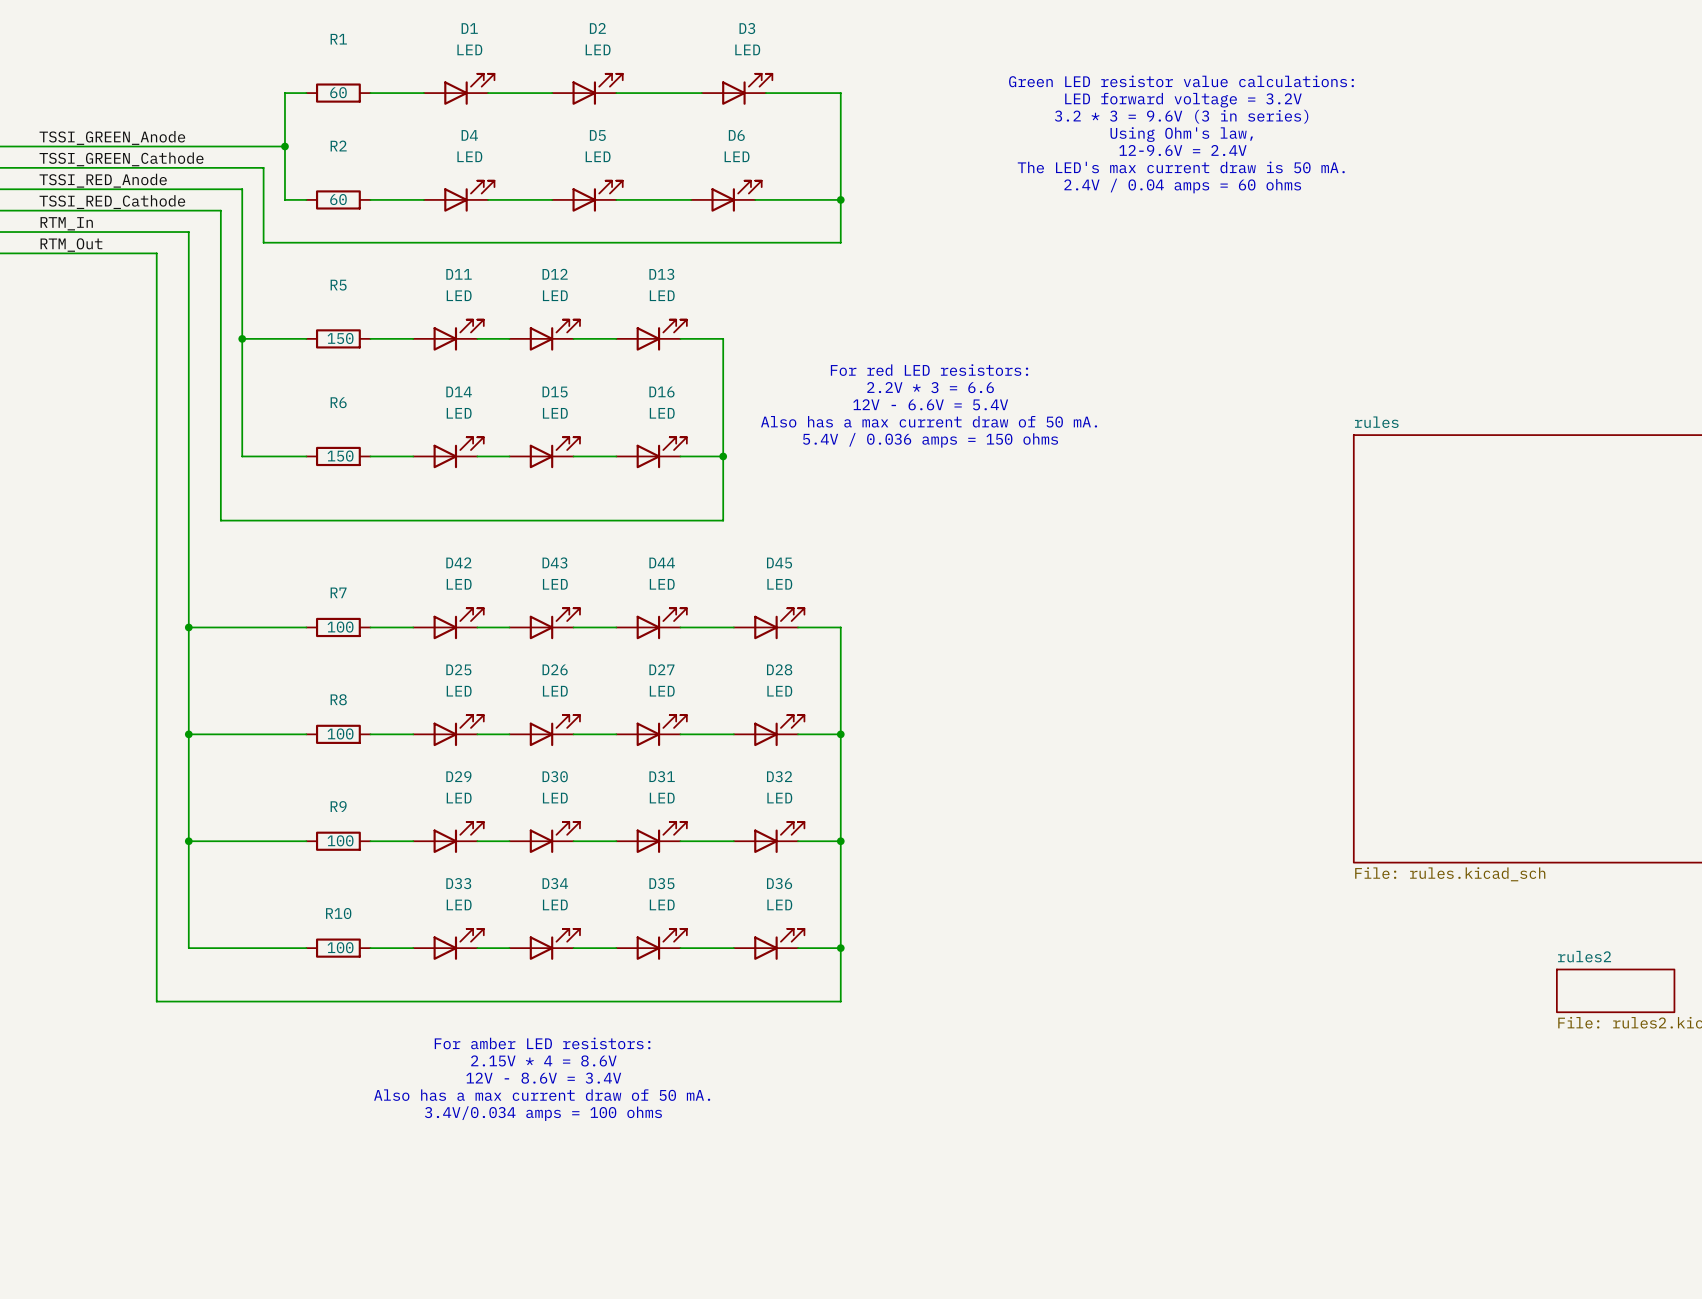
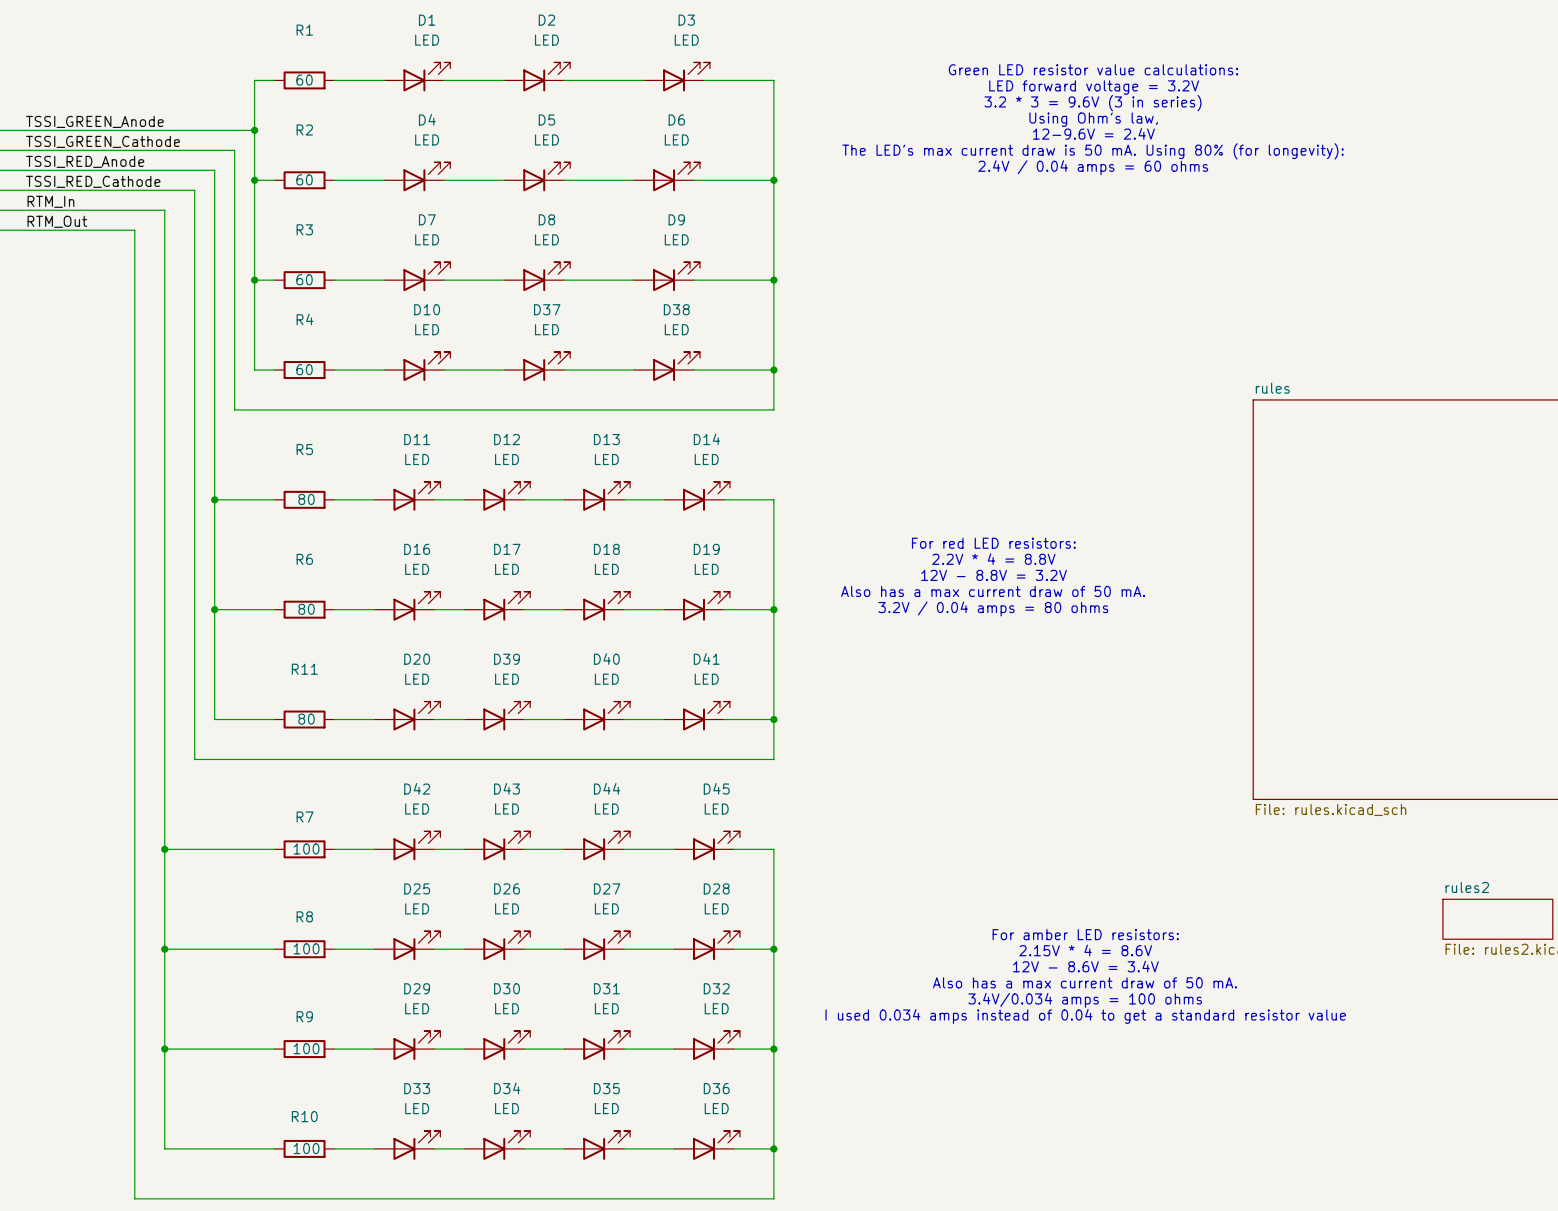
text: The LED's max current draw is 50 mA. (1181, 167) -> The LED's max current draw is 50 mA. Using 80% (for longevity): (1092, 151)
wire: none -> (254, 180) (254, 370) (274, 370)
junction: none -> (254, 180)
wire: (263, 242) (840, 242) -> (234, 220) (234, 409) (773, 409) (773, 220)
D7: none -> LED (417, 276)
D8: none -> LED (537, 276)
D9: none -> LED (667, 276)
wire: none -> (254, 280) (274, 280)
junction: none -> (254, 280)
R3: none -> 60 (304, 280)
wire: none -> (334, 280) (384, 280)
wire: none -> (444, 280) (504, 280)
wire: none -> (564, 280) (634, 280)
wire: none -> (694, 280) (773, 280)
junction: none -> (773, 280)
D11 position: (448, 335) -> (407, 496)
D12 position: (544, 335) -> (497, 496)
D13 position: (651, 335) -> (597, 496)
wire: (242, 338) (306, 338) -> (214, 499) (274, 499)
junction: (242, 338) -> none
R5 position: (338, 338) -> (304, 499)
R5 value: 150 (340, 338) -> 80 (306, 499)
wire: (370, 338) (413, 338) -> (334, 499) (374, 499)
wire: (477, 338) (509, 338) -> (434, 499) (464, 499)
wire: (573, 338) (616, 338) -> (524, 499) (564, 499)
wire: (680, 338) (723, 338) (723, 520) (220, 520) -> (773, 759) (194, 759) (194, 479)
text: For red LED resistors: (929, 370) -> none
text: 2.2V * 3 = 6.6 (930, 387) -> none
D10: none -> LED (417, 366)
D37: none -> LED (537, 366)
D38: none -> LED (667, 366)
R4: none -> 60 (304, 370)
wire: none -> (334, 370) (384, 370)
wire: none -> (444, 370) (504, 370)
wire: none -> (564, 370) (634, 370)
wire: none -> (694, 370) (773, 370)
junction: none -> (773, 370)
text: 12V - 6.6V = 5.4V (930, 404) -> none
text: Also has a max current draw of 50 mA. (929, 421) -> none
text: 5.4V / 0.036 amps = 150 ohms (930, 440) -> none
D14 position: (448, 452) -> (697, 496)
D15: LED (544, 452) -> none
D16 position: (651, 452) -> (407, 606)
wire: (242, 456) (306, 456) -> (214, 419) (214, 719) (274, 719)
R6 position: (338, 456) -> (304, 609)
R6 value: 150 (340, 456) -> 80 (306, 609)
wire: (370, 456) (413, 456) -> (334, 609) (374, 609)
wire: (477, 456) (509, 456) -> (434, 609) (464, 609)
wire: (573, 456) (616, 456) -> (524, 609) (564, 609)
wire: (680, 456) (723, 456) -> (624, 609) (664, 609)
junction: (723, 456) -> none
junction: none -> (214, 499)
wire: none -> (624, 499) (664, 499)
text: none -> For red LED resistors: (993, 543)
text: none -> 2.2V * 4 = 8.8V (993, 559)
text: none -> 12V - 8.8V = 3.2V (994, 575)
D42 position: (448, 623) -> (407, 845)
D43 position: (544, 623) -> (497, 845)
D44 position: (651, 623) -> (597, 845)
D45 position: (769, 623) -> (706, 845)
wire: (188, 627) (306, 627) -> none
junction: (188, 627) -> none
R7 position: (338, 627) -> (304, 849)
wire: (370, 627) (413, 627) -> (334, 719) (374, 719)
wire: (477, 627) (509, 627) -> (434, 719) (464, 719)
wire: (573, 627) (616, 627) -> (524, 719) (564, 719)
wire: (680, 627) (733, 627) -> (723, 609) (773, 609)
wire: (798, 627) (840, 627) -> (723, 499) (773, 499) (773, 579)
text: none -> Also has a max current draw of 50 mA. (993, 591)
D17: none -> LED (497, 606)
D18: none -> LED (597, 606)
D19: none -> LED (697, 606)
text: none -> 3.2V / 0.04 amps = 80 ohms (993, 608)
wire: none -> (214, 609) (274, 609)
junction: none -> (214, 609)
junction: none -> (773, 609)
D25 position: (448, 730) -> (407, 945)
D26 position: (544, 730) -> (497, 945)
D27 position: (651, 730) -> (597, 945)
D28 position: (769, 730) -> (706, 945)
wire: (188, 734) (306, 734) -> (164, 849) (274, 849)
junction: (188, 734) -> none
R8 position: (338, 734) -> (304, 949)
wire: (370, 734) (413, 734) -> (334, 849) (374, 849)
wire: (477, 734) (509, 734) -> (434, 849) (464, 849)
wire: (573, 734) (616, 734) -> (524, 849) (564, 849)
wire: (680, 734) (733, 734) -> (624, 849) (674, 849)
wire: (798, 734) (840, 734) -> (624, 719) (664, 719)
junction: (840, 734) -> none
D20: none -> LED (407, 716)
D39: none -> LED (497, 716)
D40: none -> LED (597, 716)
D41: none -> LED (697, 716)
R11: none -> 80 (304, 719)
wire: none -> (723, 719) (773, 719)
junction: none -> (773, 719)
wire: (840, 819) (840, 916) -> (733, 849) (773, 849)
D29 position: (448, 837) -> (407, 1045)
D30 position: (544, 837) -> (497, 1045)
D31 position: (651, 837) -> (597, 1045)
D32 position: (769, 837) -> (706, 1045)
wire: (188, 841) (306, 841) -> (164, 949) (274, 949)
junction: (188, 841) -> none
R9 position: (338, 841) -> (304, 1049)
wire: (370, 841) (413, 841) -> (334, 949) (374, 949)
wire: (477, 841) (509, 841) -> (434, 949) (464, 949)
wire: (573, 841) (616, 841) -> (524, 949) (564, 949)
wire: (680, 841) (733, 841) -> (624, 949) (674, 949)
wire: (798, 841) (840, 841) -> (733, 949) (773, 949)
junction: (840, 841) -> none
junction: none -> (164, 849)
D33 position: (448, 944) -> (407, 1145)
D34 position: (544, 944) -> (497, 1145)
D35 position: (651, 944) -> (597, 1145)
D36 position: (769, 944) -> (706, 1145)
wire: (188, 948) (306, 948) -> (164, 879) (164, 1148) (274, 1148)
R10 position: (338, 948) -> (304, 1148)
wire: (370, 948) (413, 948) -> (334, 1049) (374, 1049)
wire: (477, 948) (509, 948) -> (434, 1049) (464, 1049)
wire: (573, 948) (616, 948) -> (524, 1049) (564, 1049)
wire: (680, 948) (733, 948) -> (624, 1049) (674, 1049)
wire: (798, 948) (840, 948) -> (733, 1049) (773, 1049)
junction: (840, 948) -> none
wire: (156, 1001) (840, 1001) -> (134, 929) (134, 1198) (773, 1198) (773, 929)
text: none -> For amber LED resistors: (1085, 934)
junction: none -> (164, 949)
junction: none -> (773, 949)
text: none -> 2.15V * 4 = 8.6V (1085, 950)
text: none -> 12V - 8.6V = 3.4V (1085, 966)
text: For amber LED resistors: (542, 1043) -> none
text: none -> Also has a max current draw of 50 mA. (1084, 982)
text: 2.15V * 4 = 8.6V (543, 1060) -> none
text: none -> 3.4V/0.034 amps = 100 ohms (1085, 1000)
text: 12V - 8.6V = 3.4V (543, 1078) -> none
text: none -> I used 0.034 amps instead of 0.04 to get a standard resistor value (1085, 1016)
text: Also has a max current draw of 50 mA. (542, 1095) -> none
text: 3.4V/0.034 amps = 100 ohms (543, 1113) -> none
wire: none -> (164, 1049) (274, 1049)
junction: none -> (164, 1049)
junction: none -> (773, 1049)
wire: none -> (334, 1148) (374, 1148)
wire: none -> (434, 1148) (464, 1148)
wire: none -> (524, 1148) (564, 1148)
wire: none -> (624, 1148) (674, 1148)
wire: none -> (733, 1148) (773, 1148)
junction: none -> (773, 1148)

